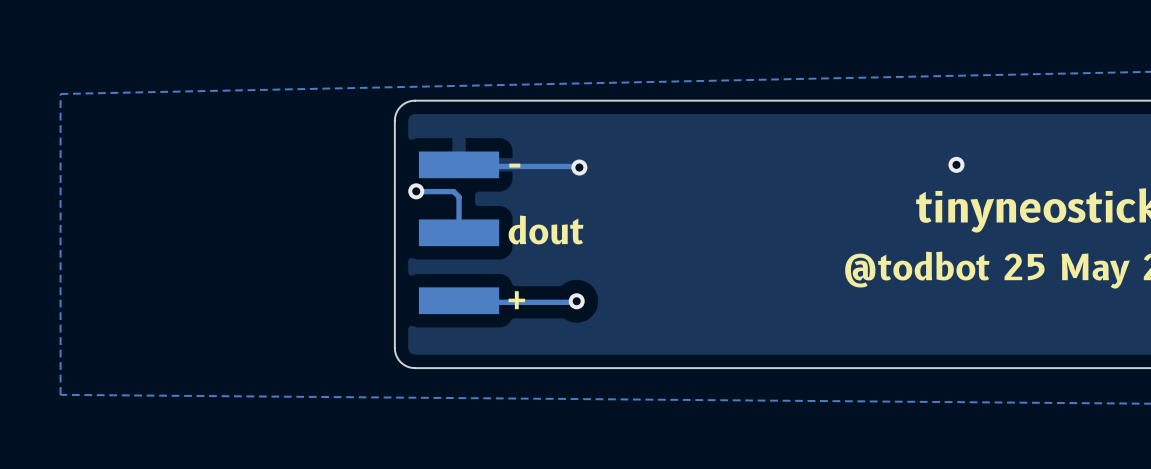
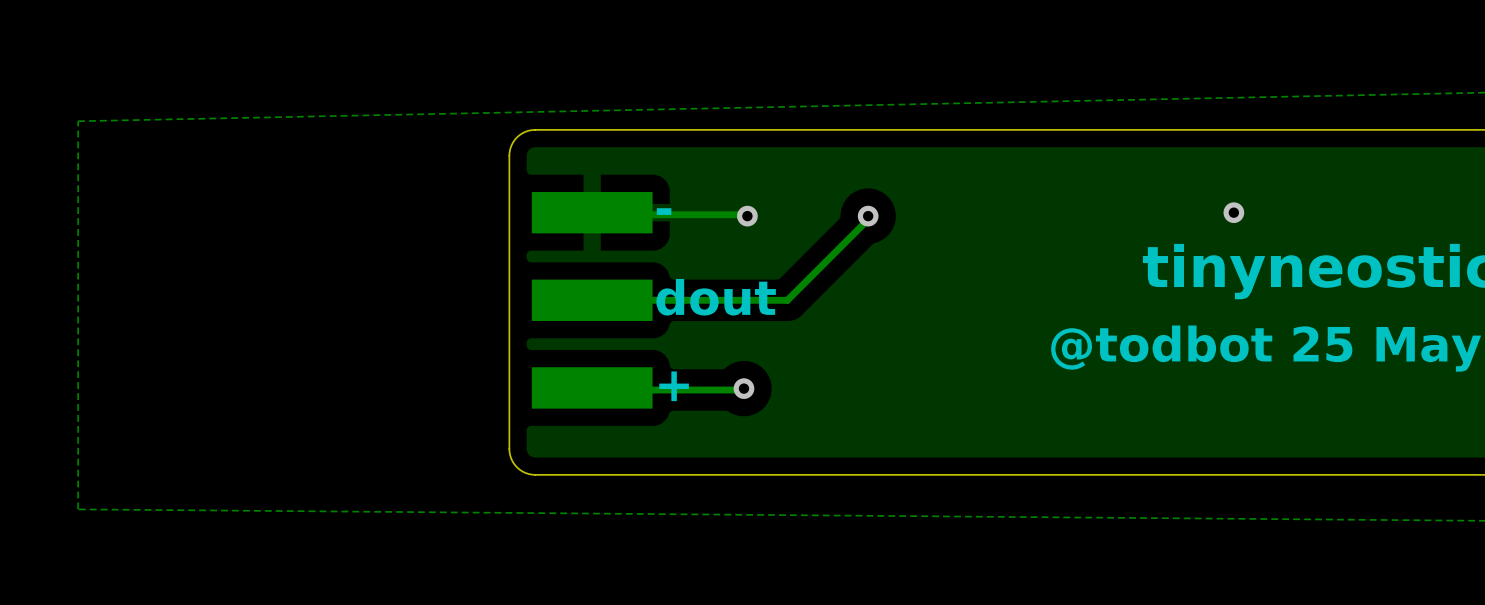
part footprint: [418, 151, 500, 315] -> [531, 191, 653, 409]
track: none -> (868, 216) (868, 219) (787, 300) (599, 300)
via: none -> (868, 216)
track: (416, 191) (453, 191) (459, 196) (459, 232) -> none
via: (416, 191) -> none

